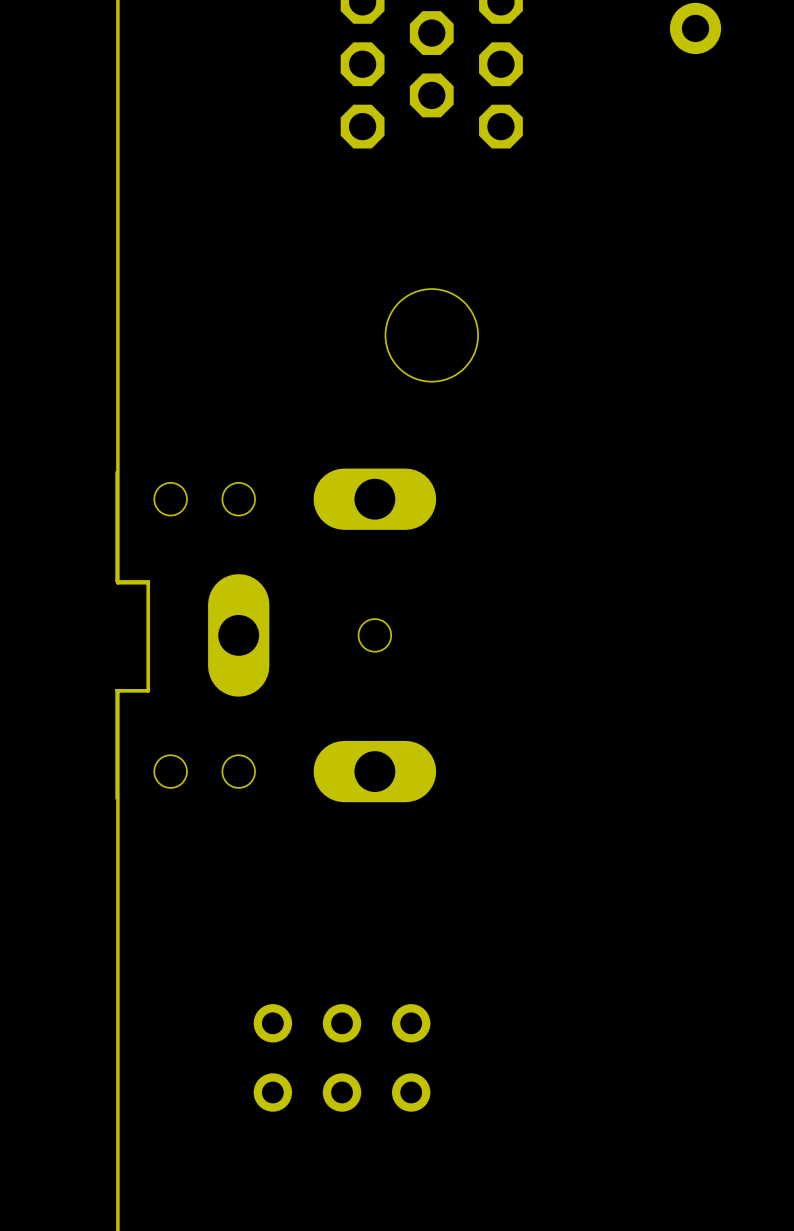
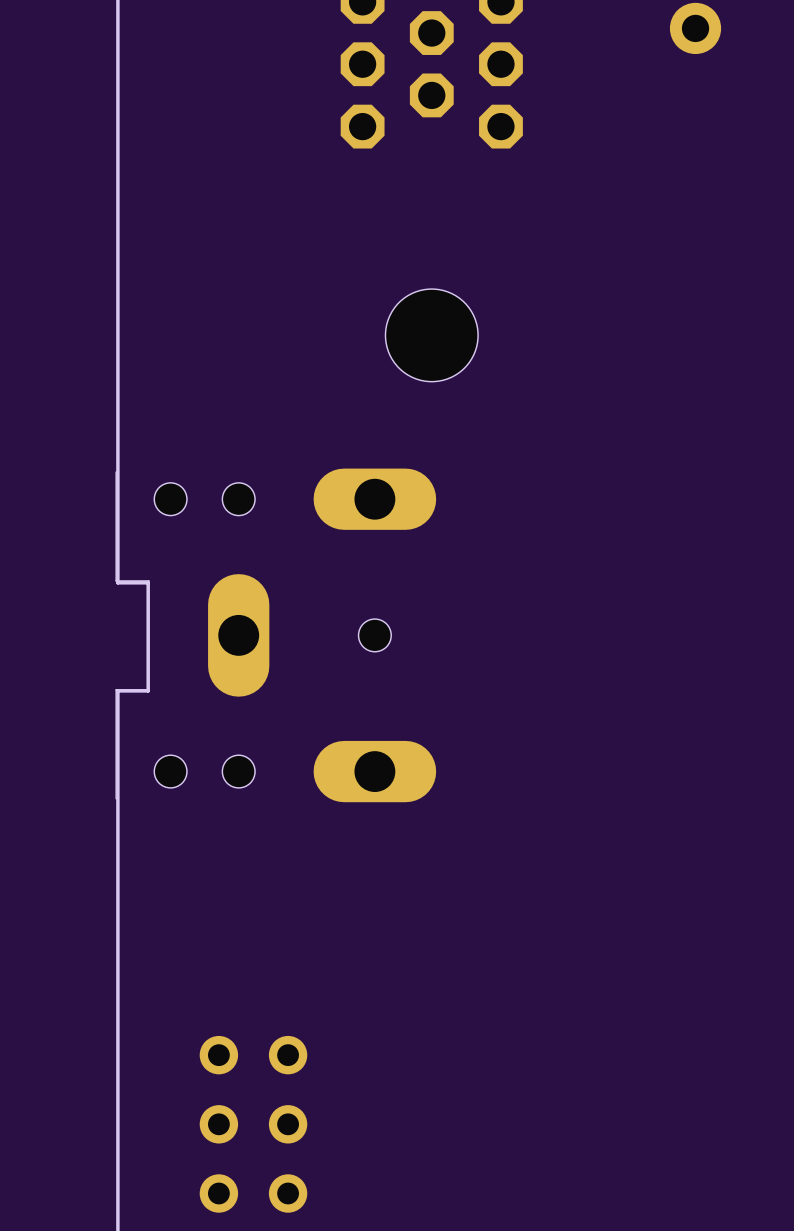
part rotation: 0° (342, 1057) -> 90° clockwise (253, 1124)
part position: (342, 1057) -> (253, 1124)

